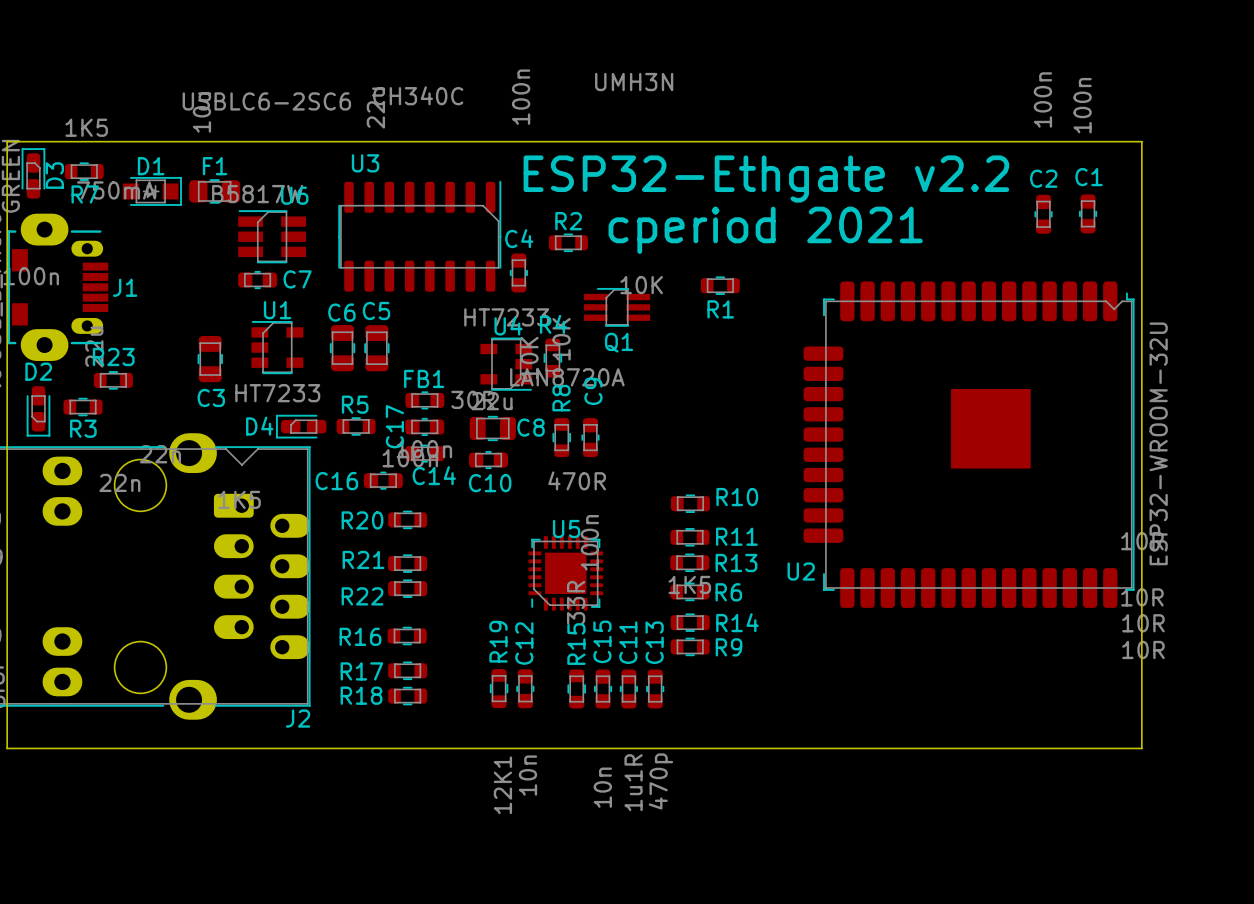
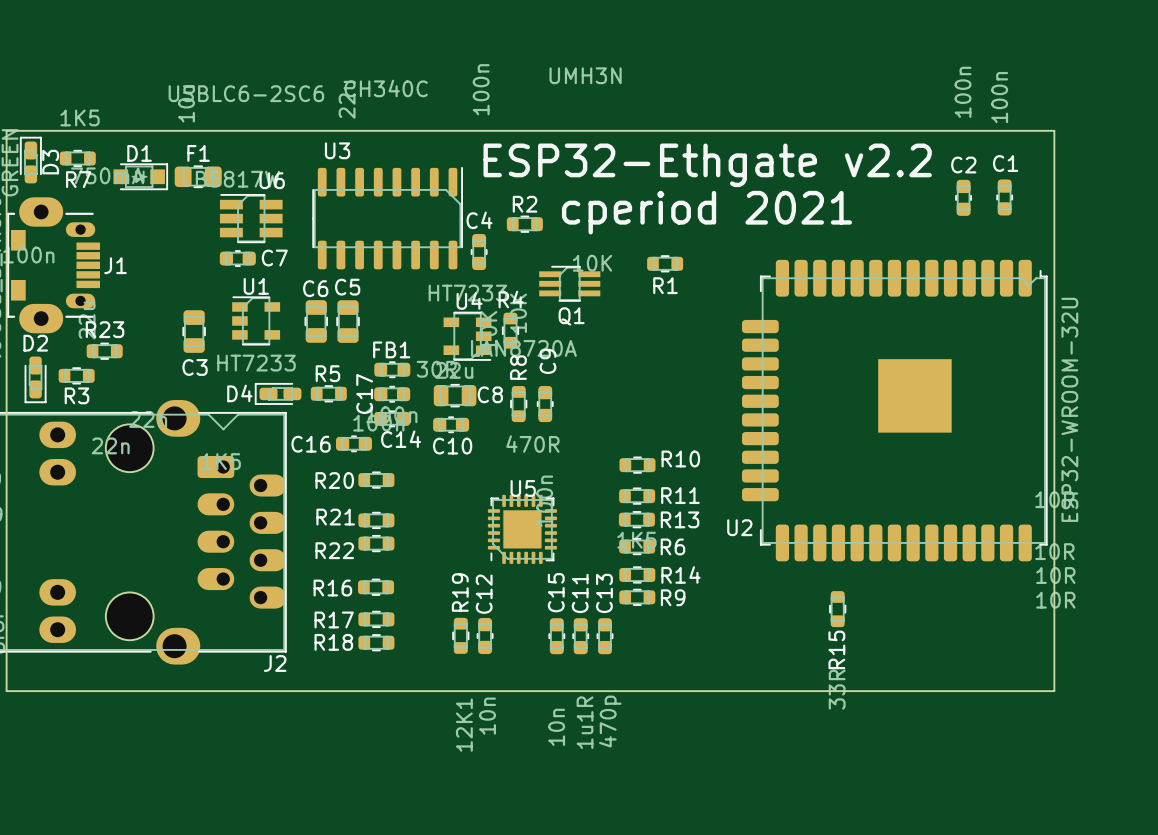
R15 value position: 33R (576, 602) -> 33R (837, 689)
R15 name position: R15 (576, 644) -> R15 (836, 649)
R15 position: (576, 689) -> (837, 609)

